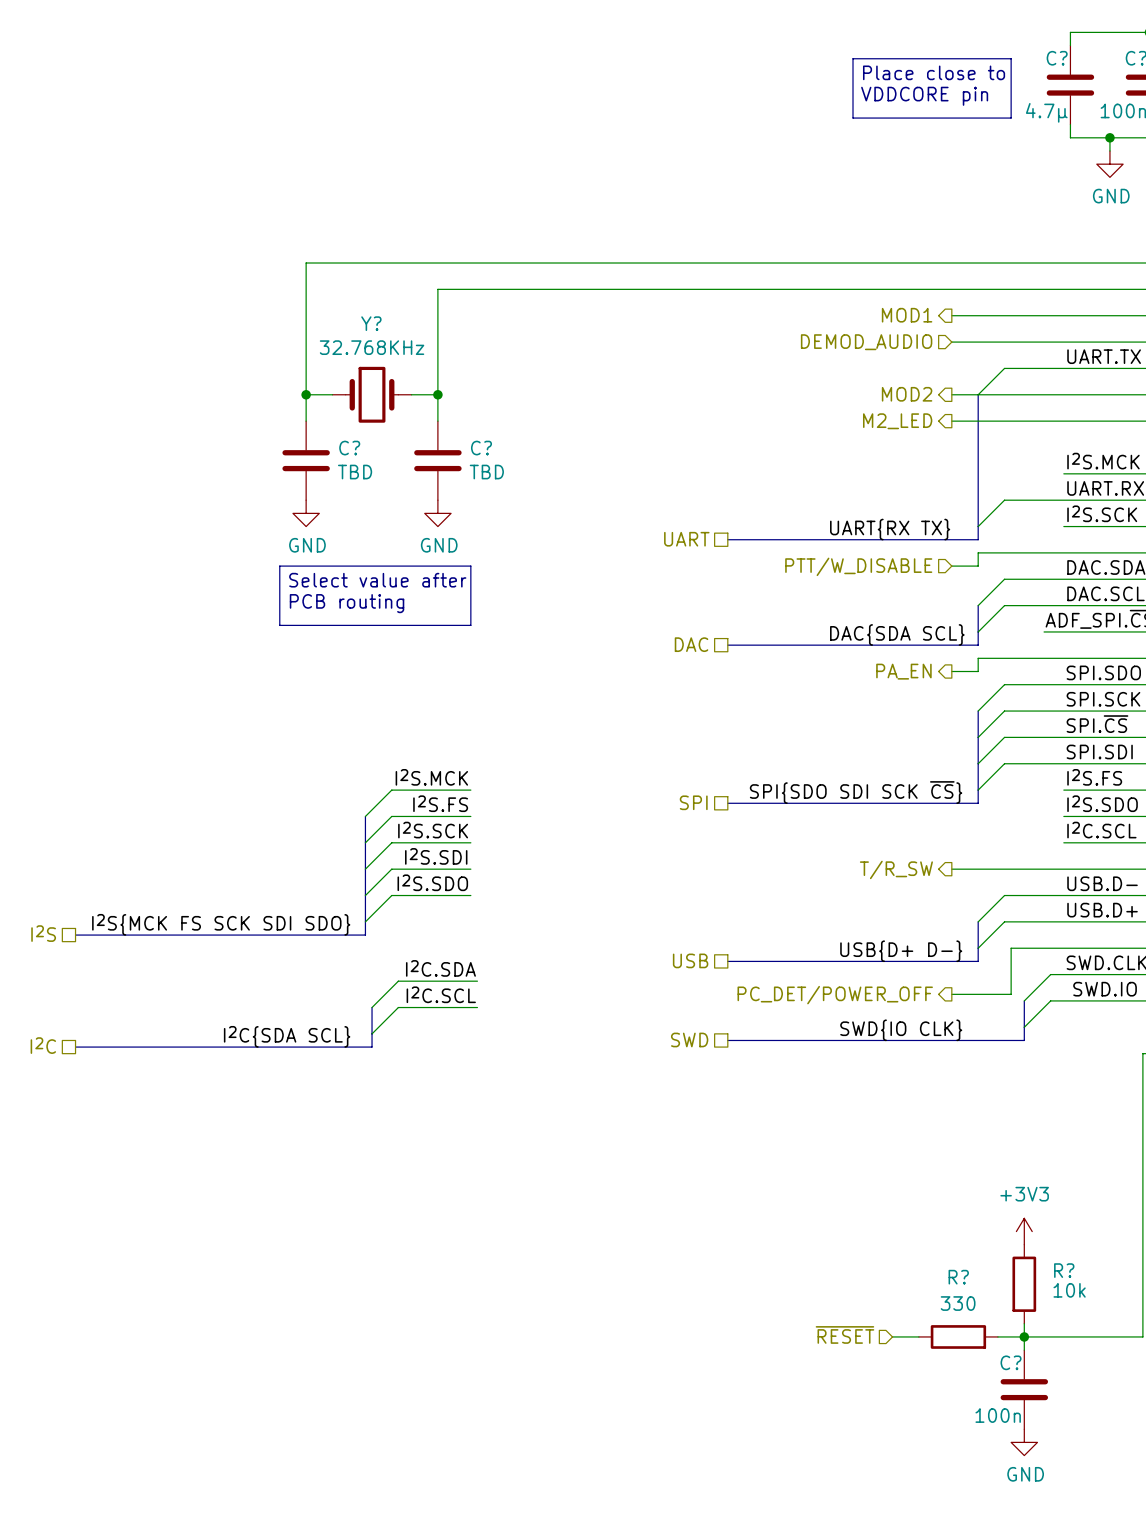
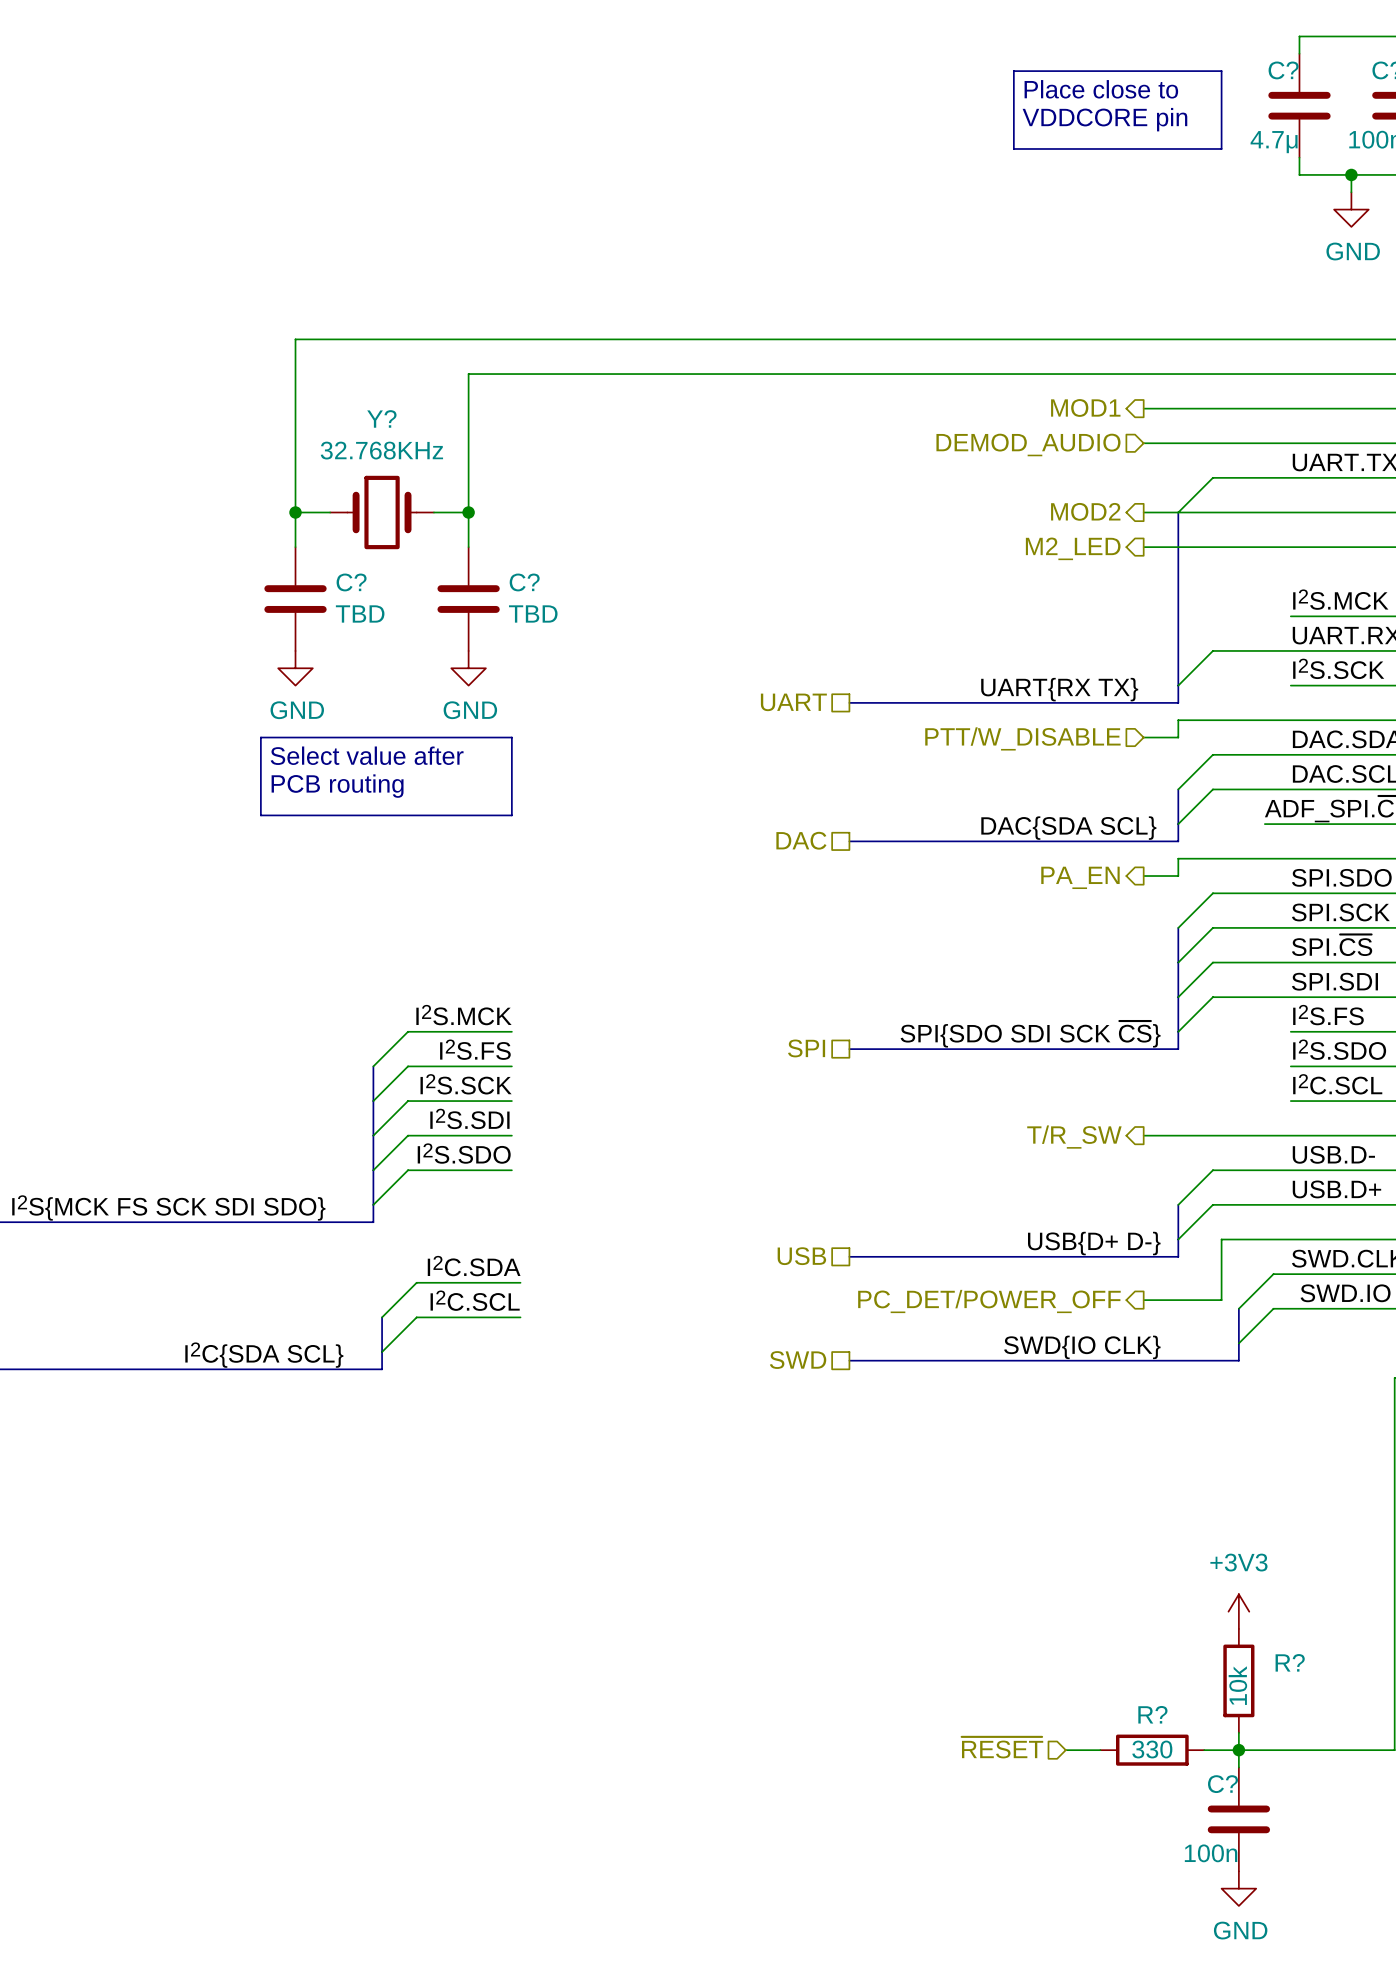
R? name position: R? (958, 1277) -> R? (1152, 1714)
R? value rotation: 0° (1069, 1290) -> 90° counterclockwise (1237, 1685)
R? value position: 10k (1069, 1290) -> 10k (1237, 1685)
R? value position: 330 (958, 1303) -> 330 (1152, 1749)

